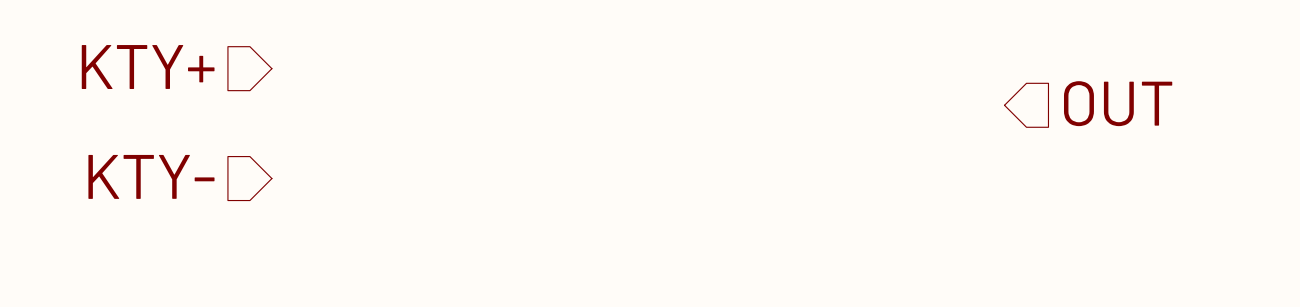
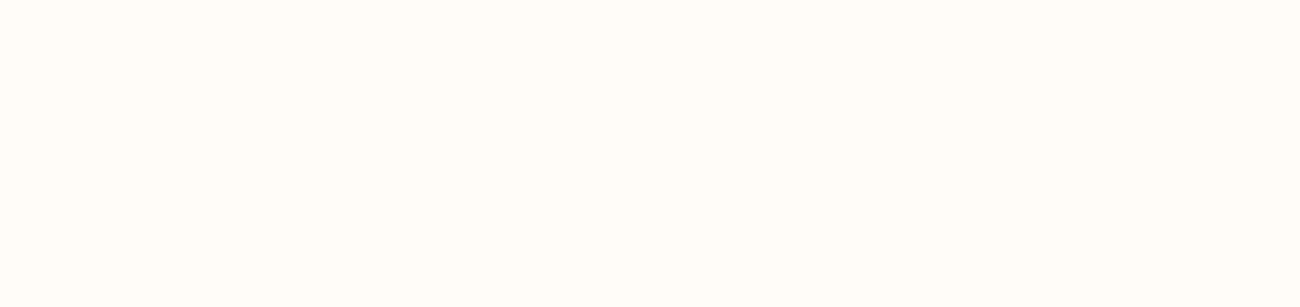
hierarchical label: KTY+ (148, 67) -> none
hierarchical label: OUT (1118, 103) -> none
hierarchical label: KTY- (151, 176) -> none

